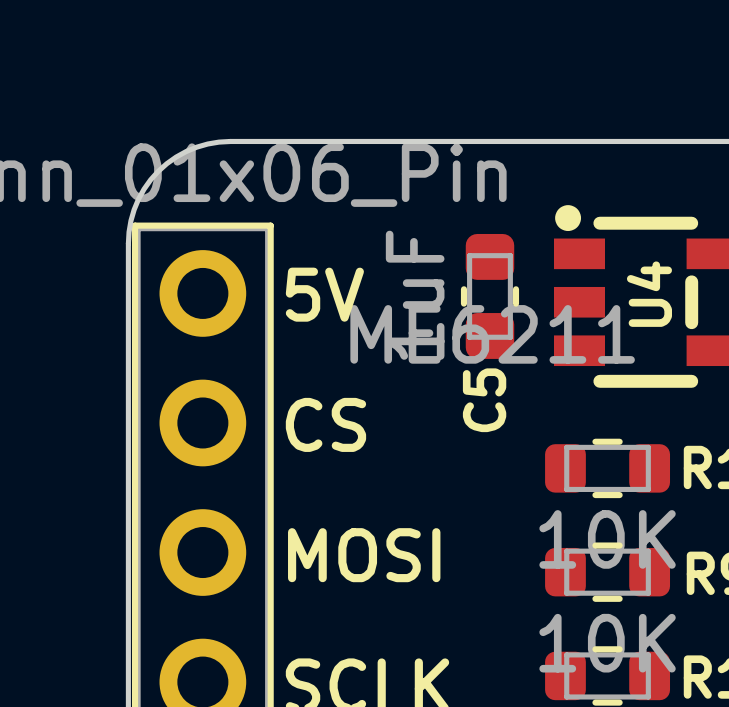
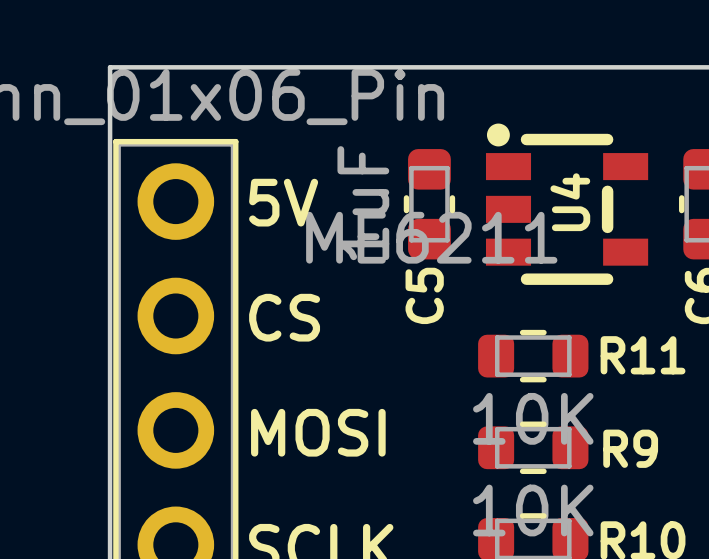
board edge: (230, 141) (207, 144) (186, 151) (158, 171) (144, 189) (134, 209) (128, 243) -> (200, 67) (110, 67) (110, 157)

